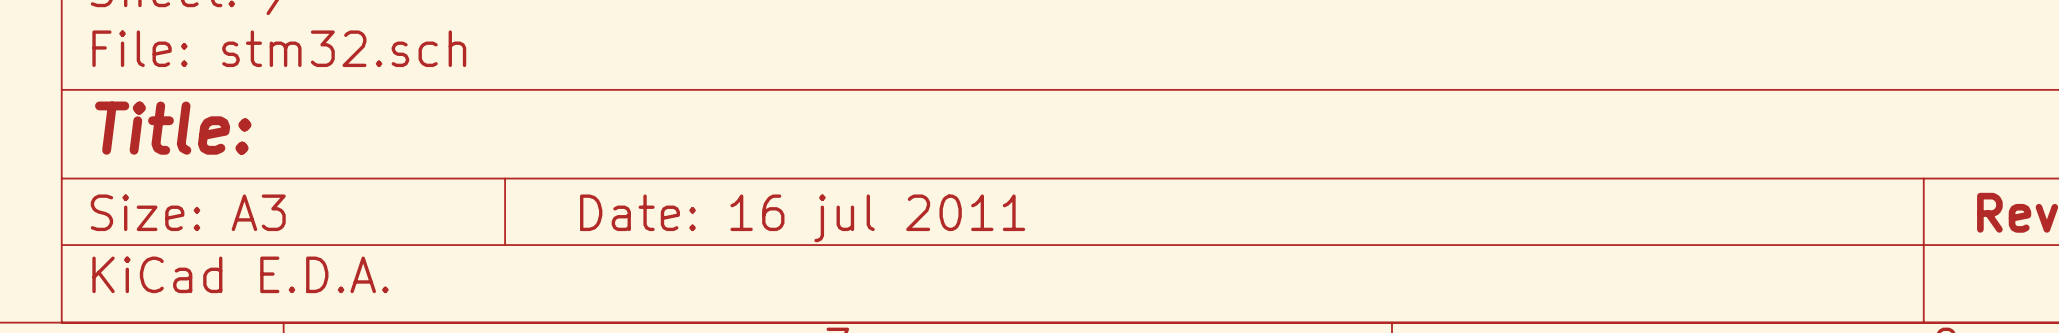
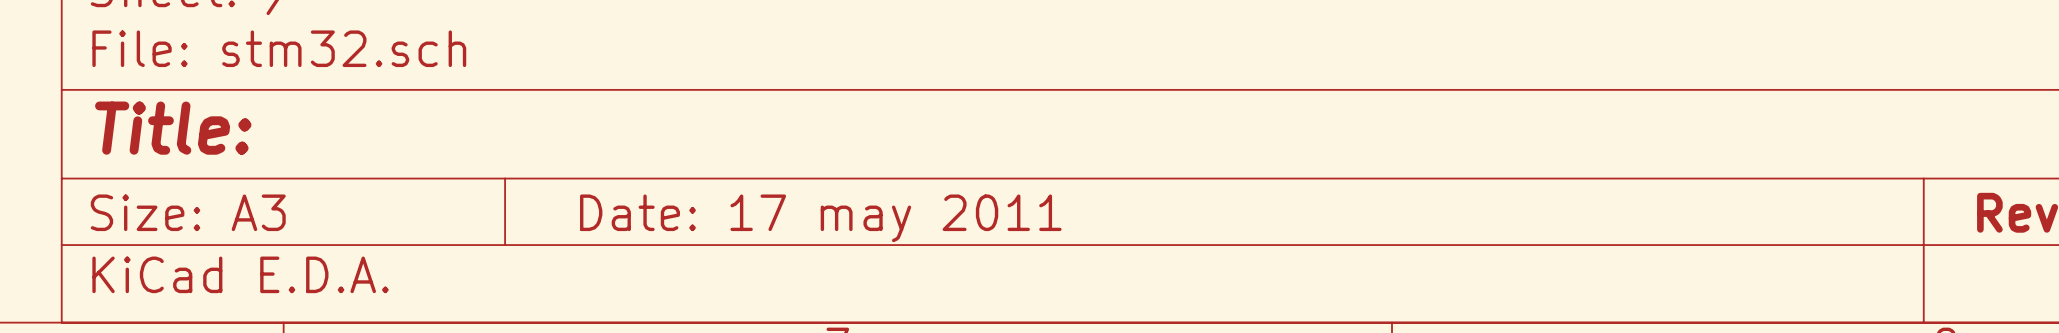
title block: Date: 16 jul 2011 (802, 218) -> Date: 17 may 2011 (820, 218)

